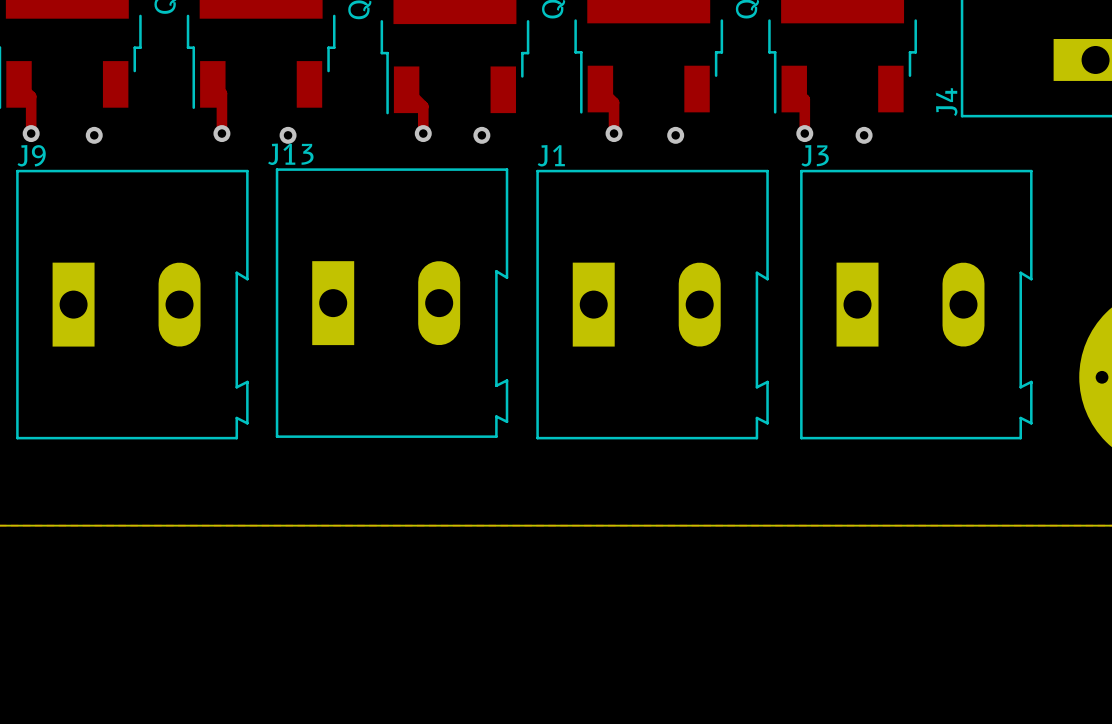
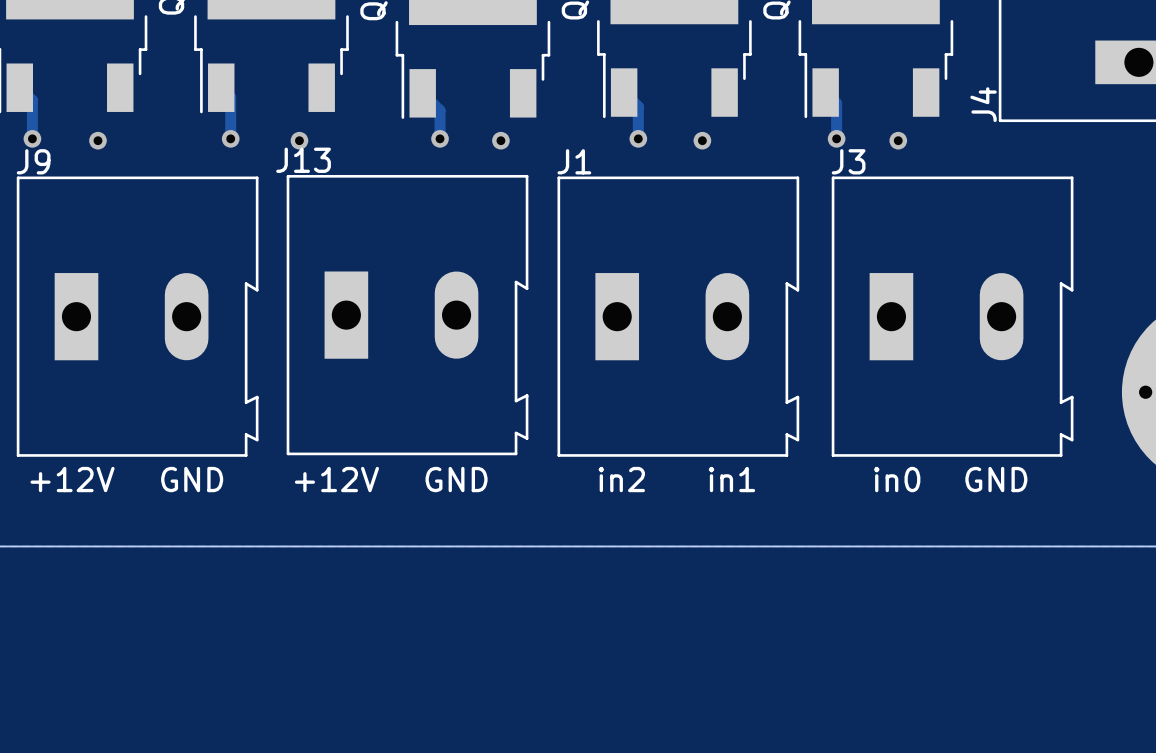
text: none -> +12V (72, 479)
text: none -> GND (192, 479)
text: none -> +12V (336, 479)
text: none -> GND (456, 479)
text: none -> in2 (621, 479)
text: none -> in1 (731, 479)
text: none -> in0 (897, 479)
text: none -> GND (996, 479)

